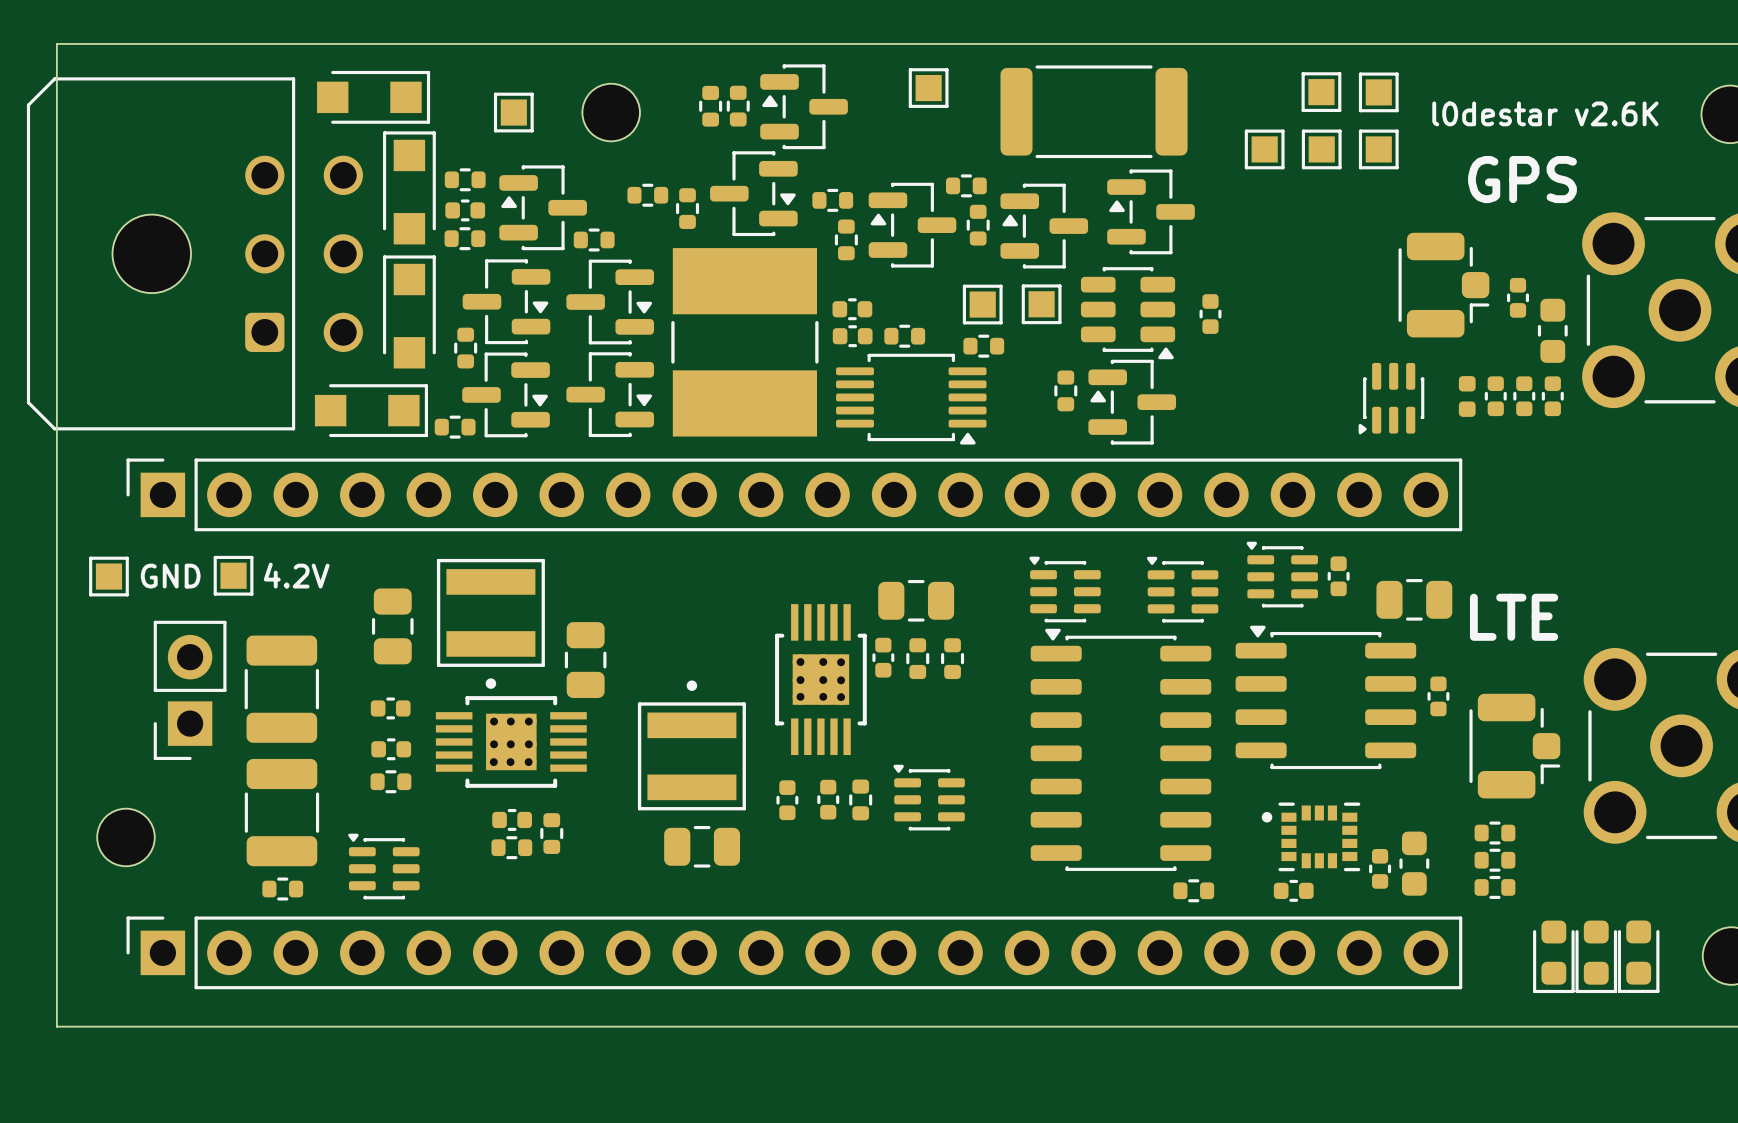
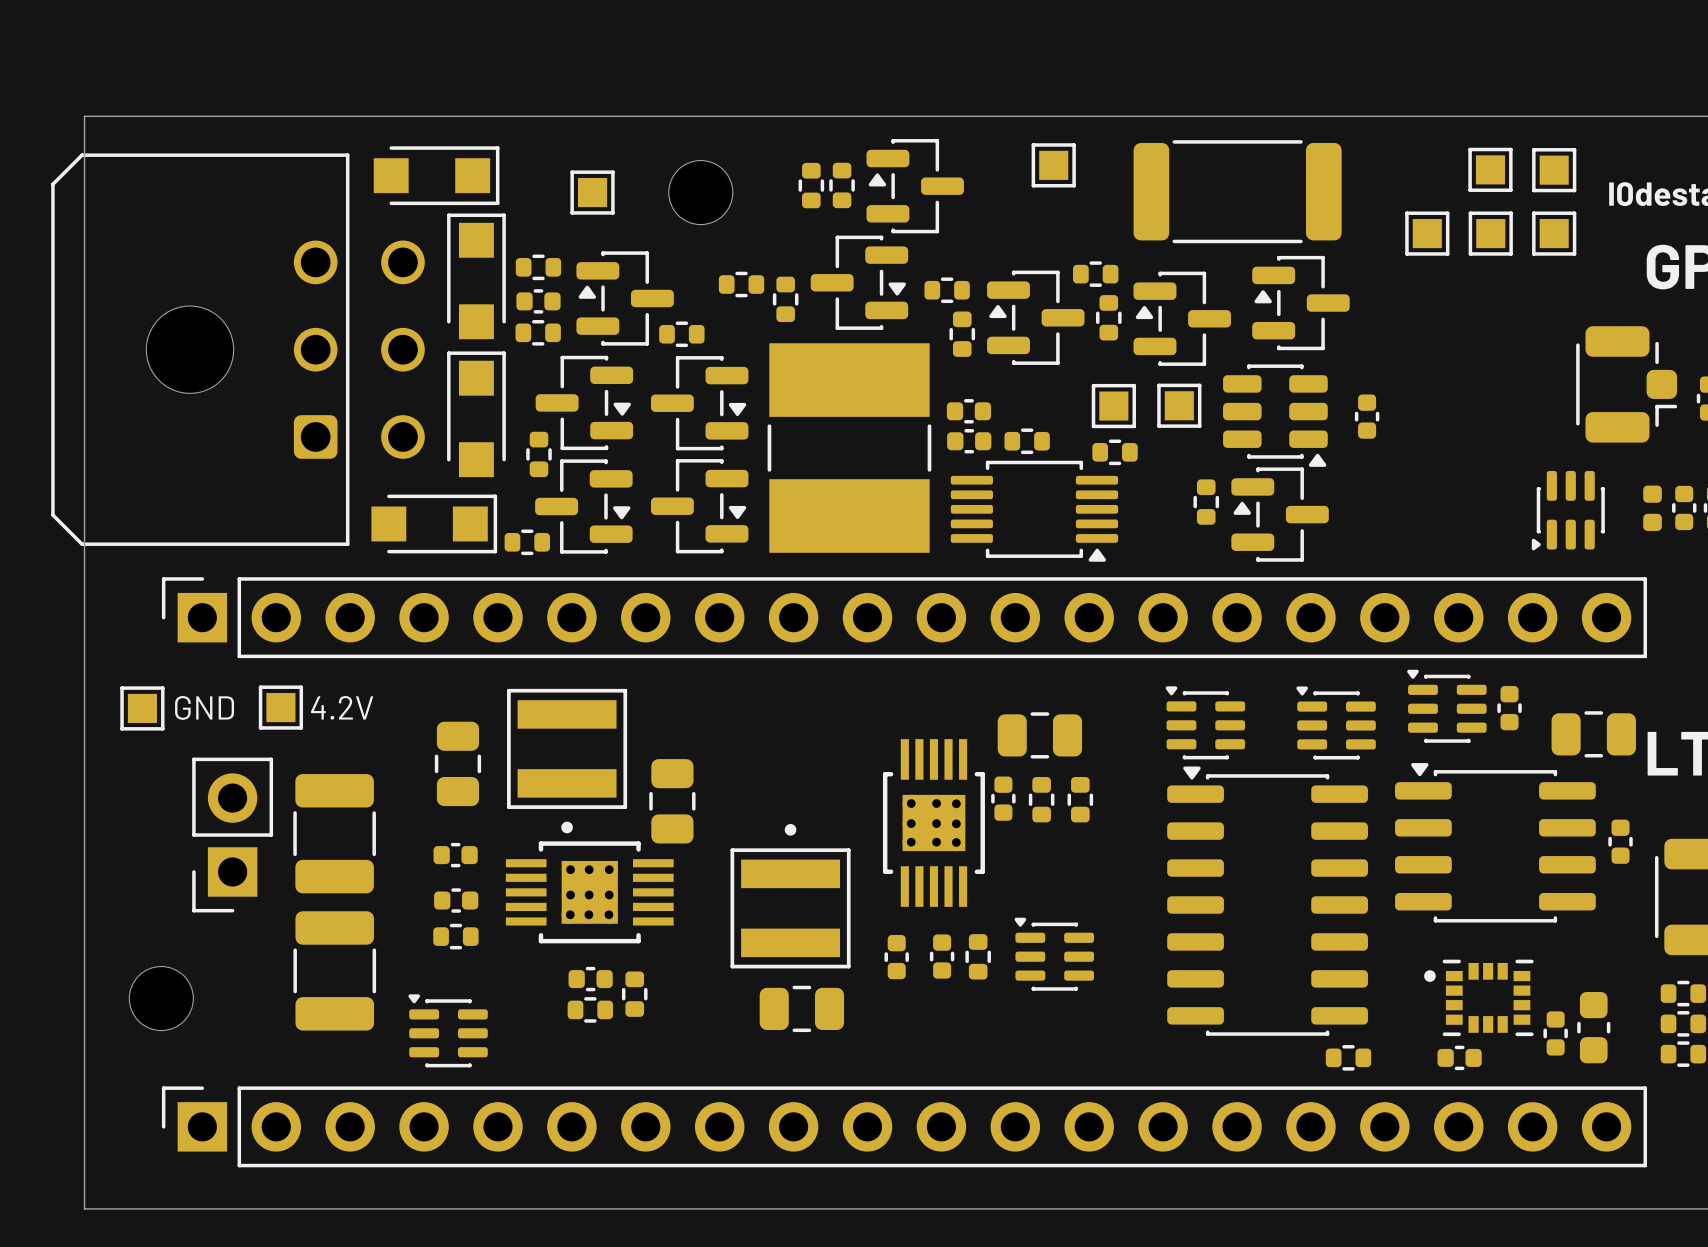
part: (282, 889) -> none

